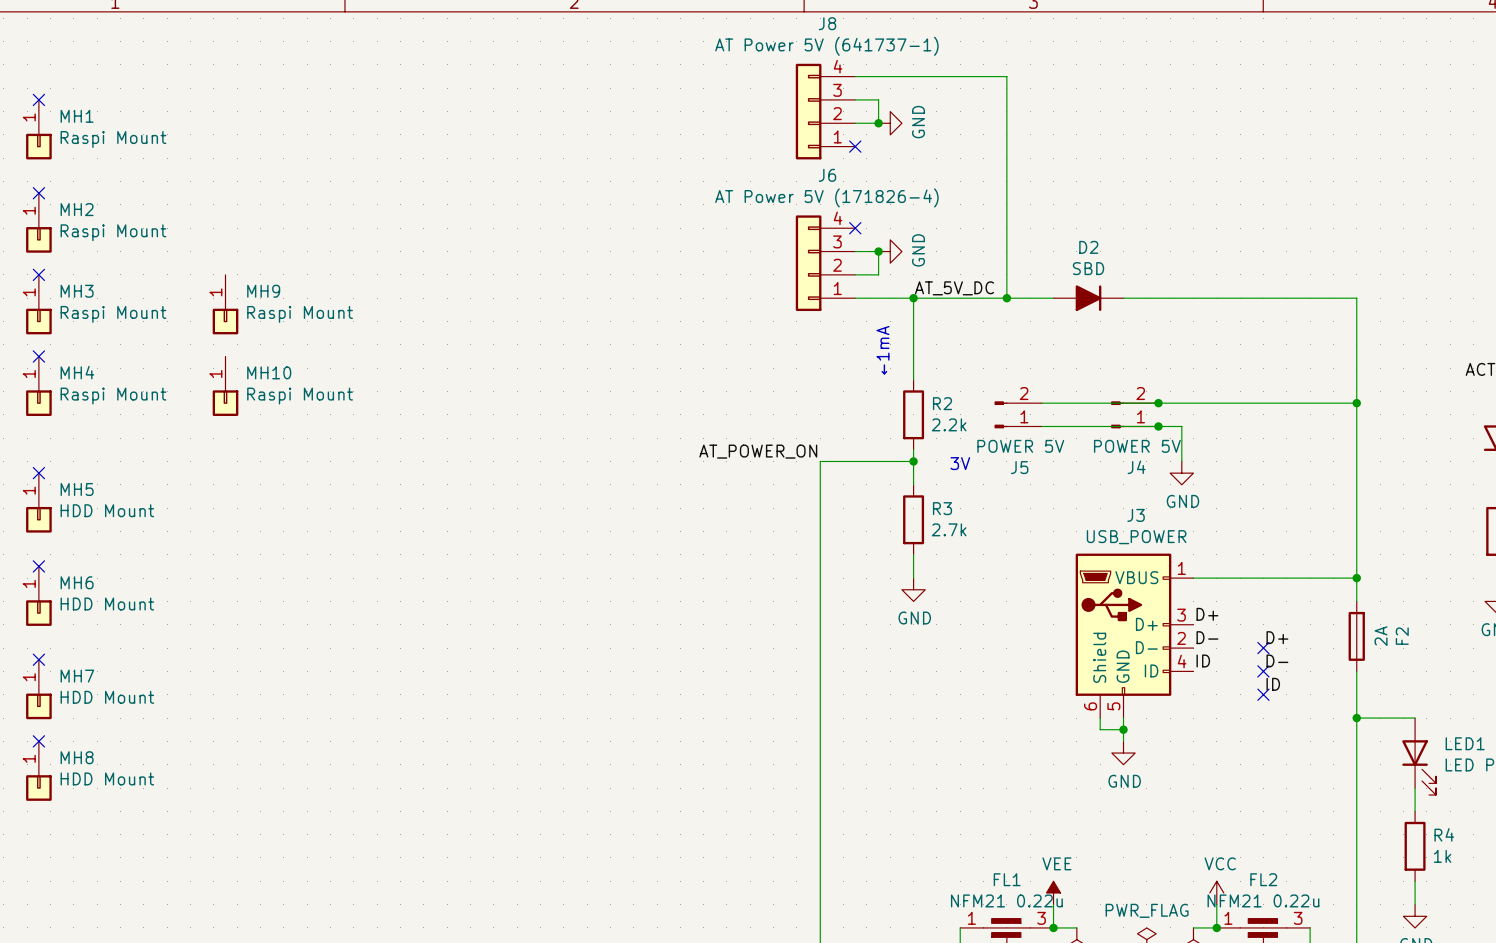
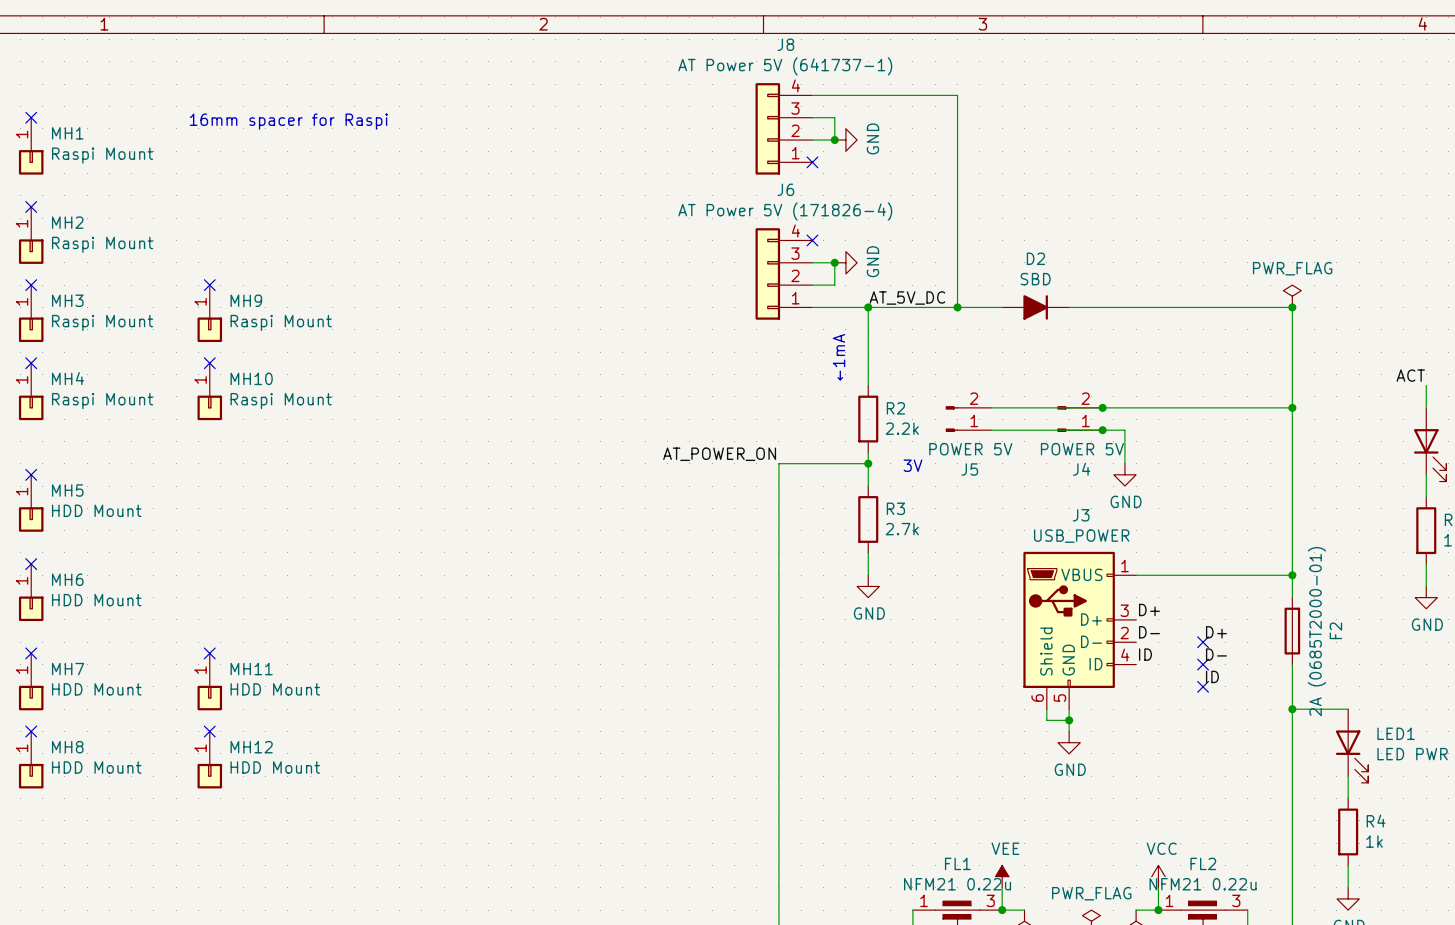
text: none -> 16mm spacer for Raspi (288, 121)
no-connect mark: none -> (209, 285)
power symbol: none -> PWR_FLAG (1292, 296)
junction: none -> (1292, 307)
no-connect mark: none -> (209, 363)
F2 value: 2A (1381, 636) -> 2A (0685T2000-01) (1316, 631)
no-connect mark: none -> (209, 653)
MH11: none -> HDD Mount (209, 681)
no-connect mark: none -> (209, 731)
MH12: none -> HDD Mount (209, 759)

